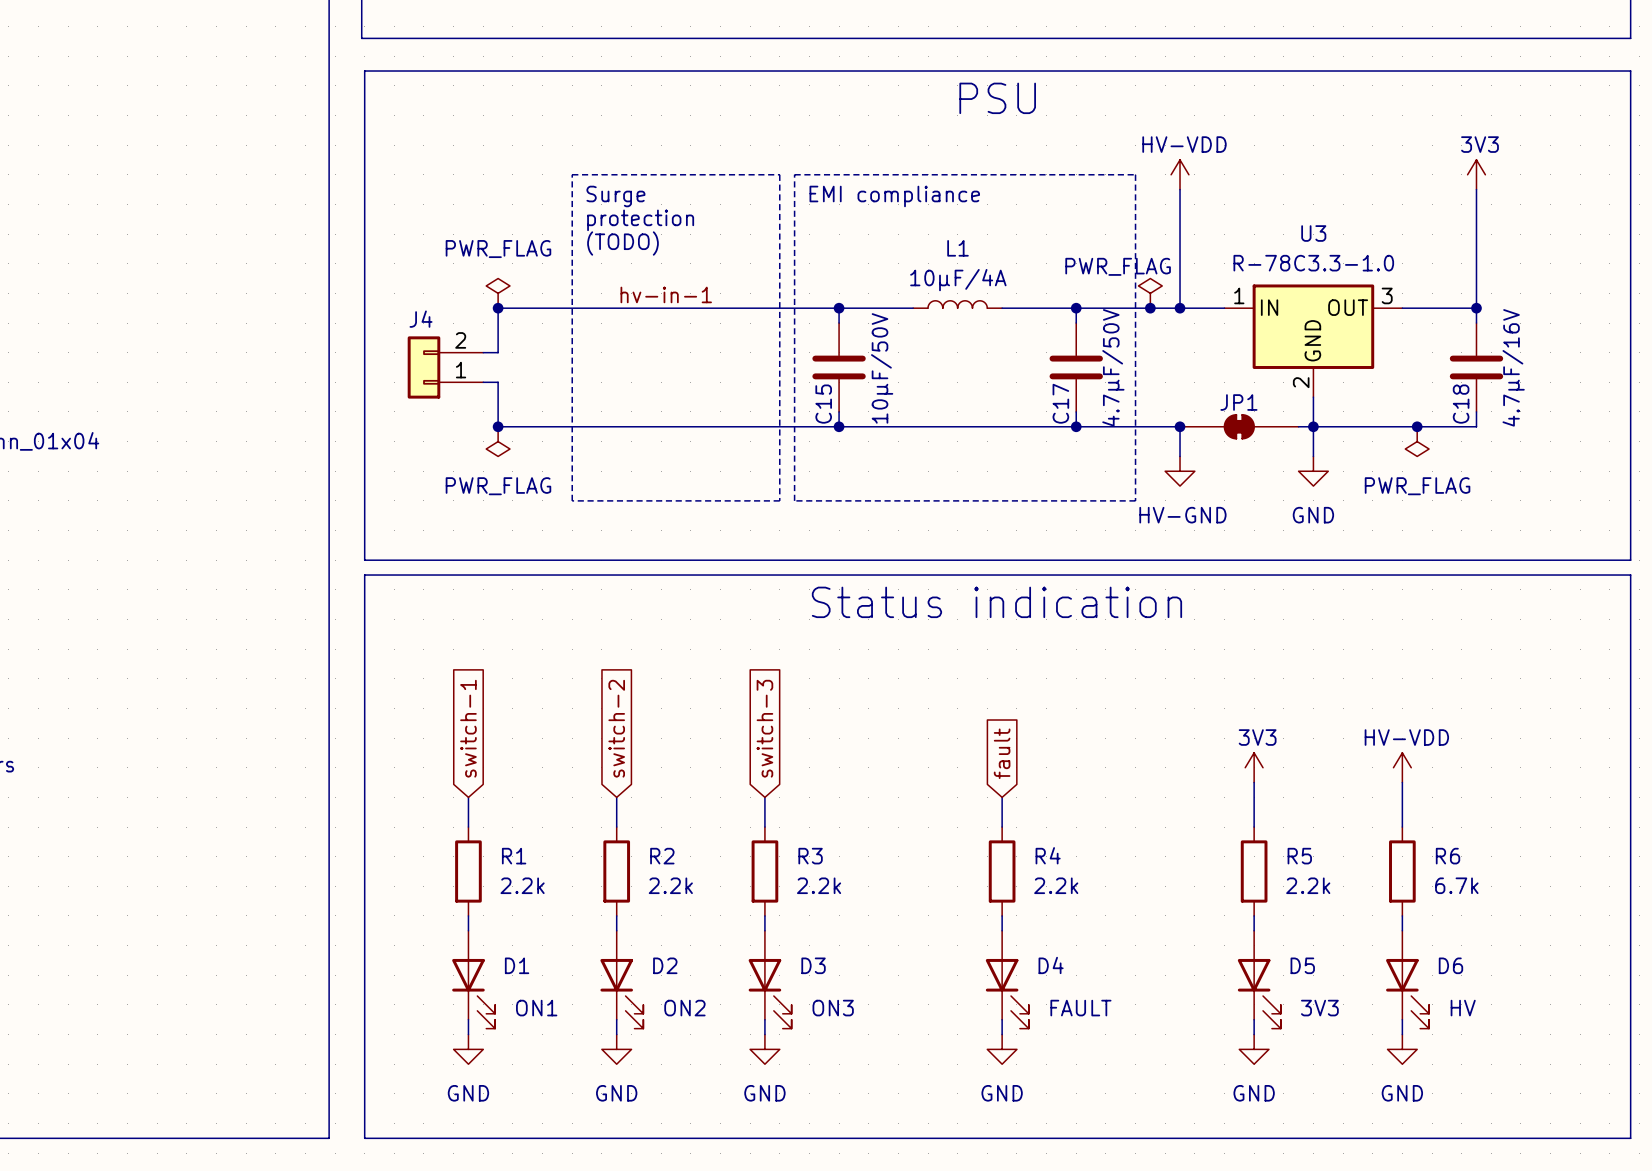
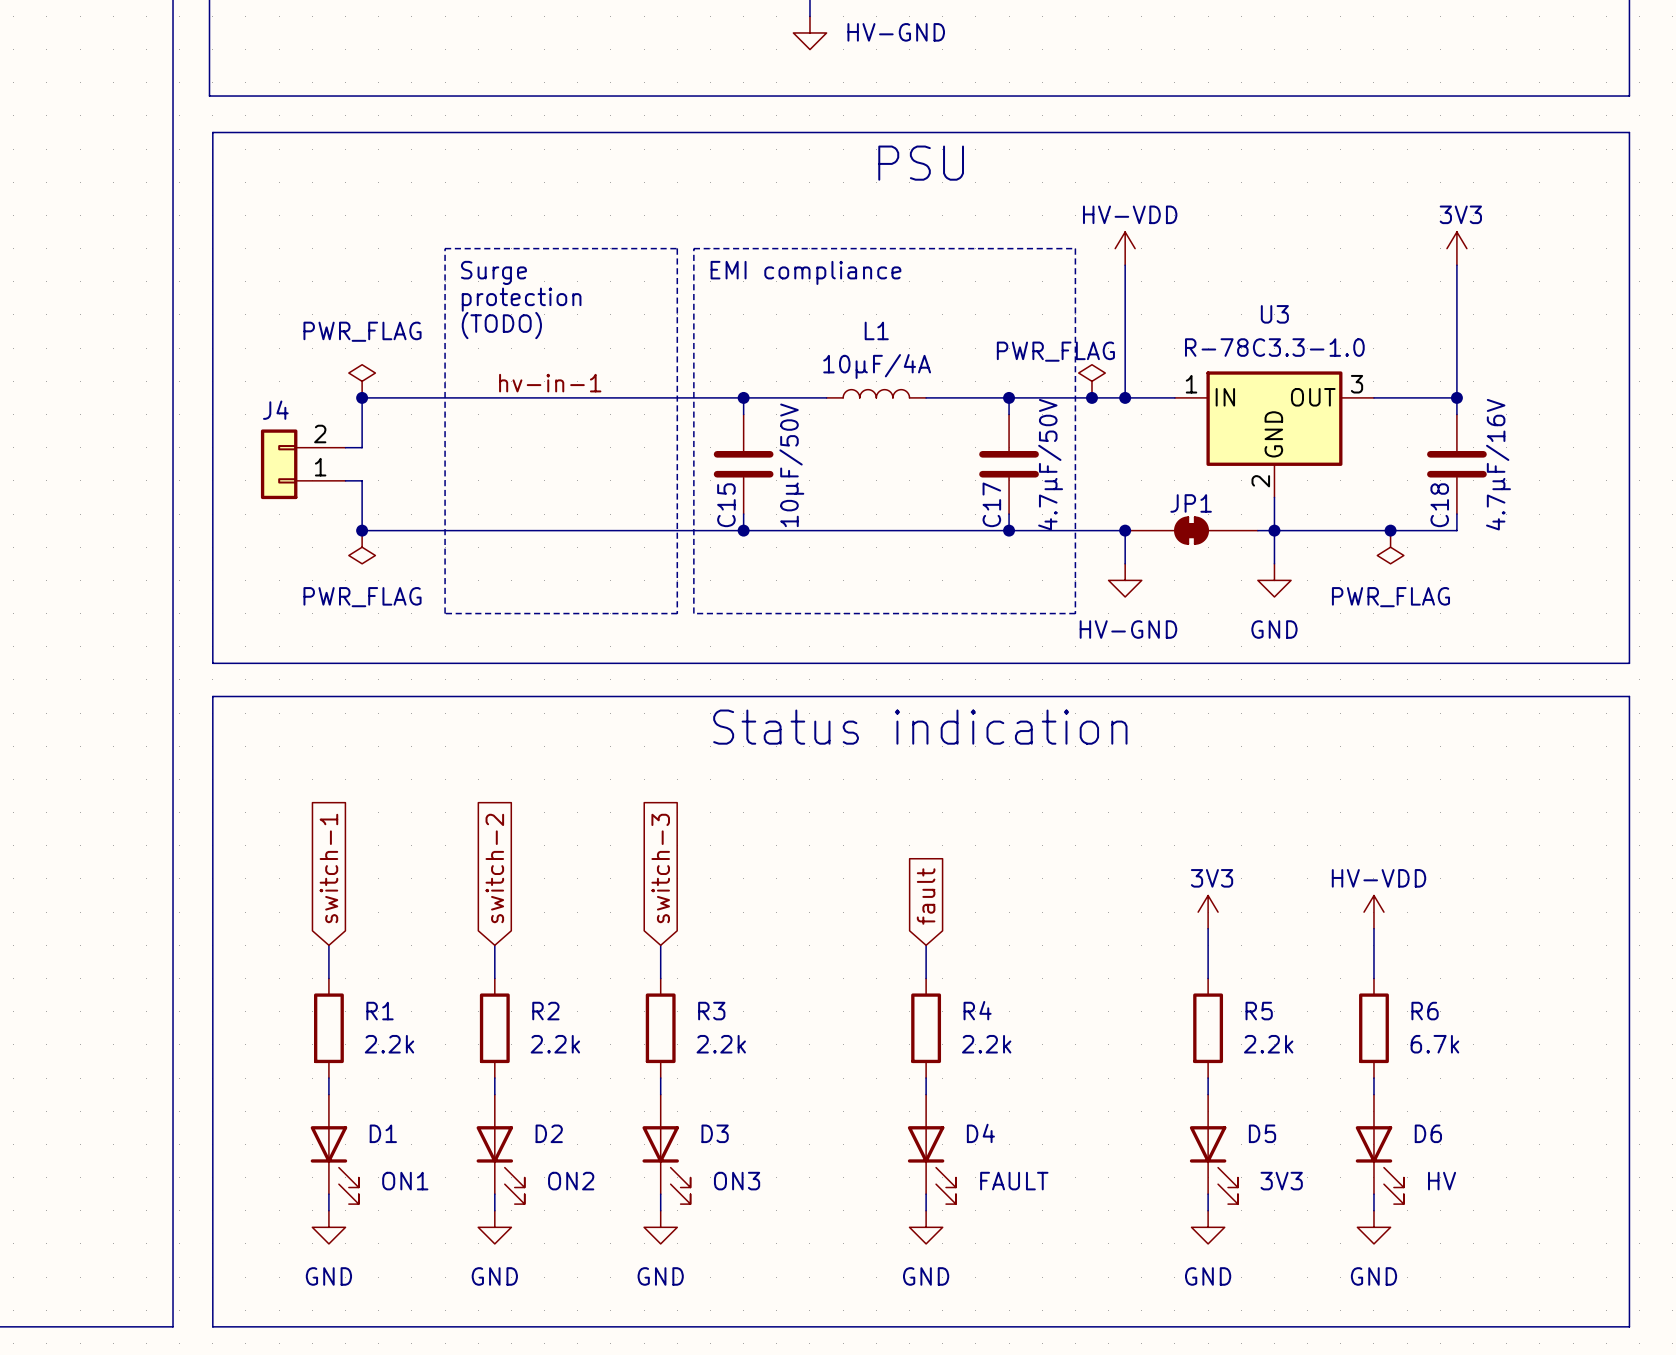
line: (364, 545) (364, 560) (1630, 560) (1630, 545) -> (212, 663) (1629, 663)

